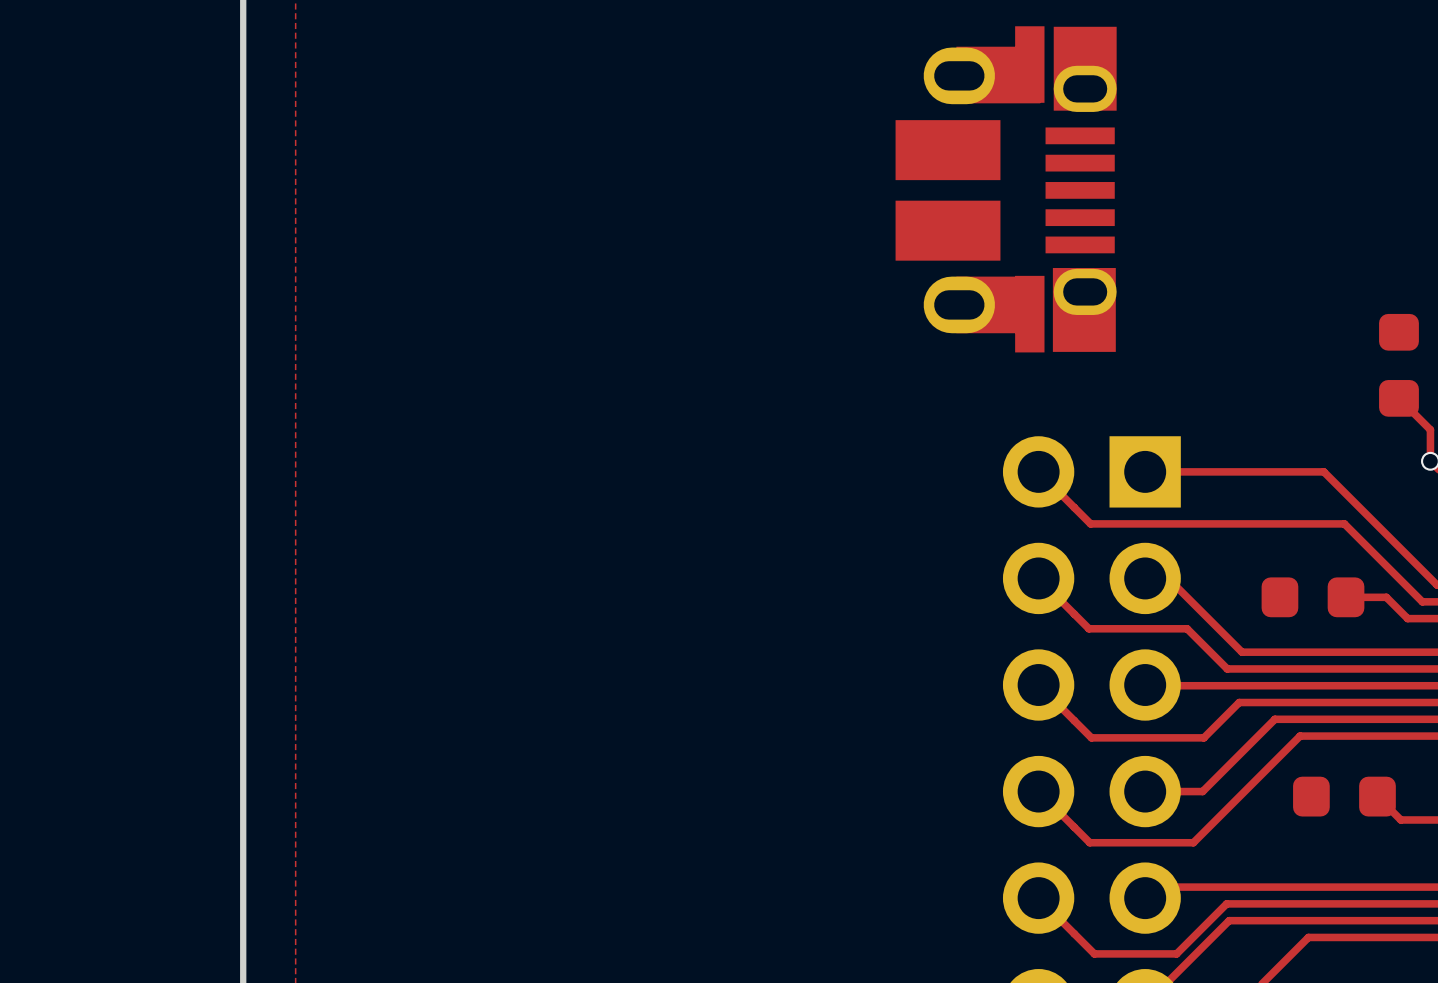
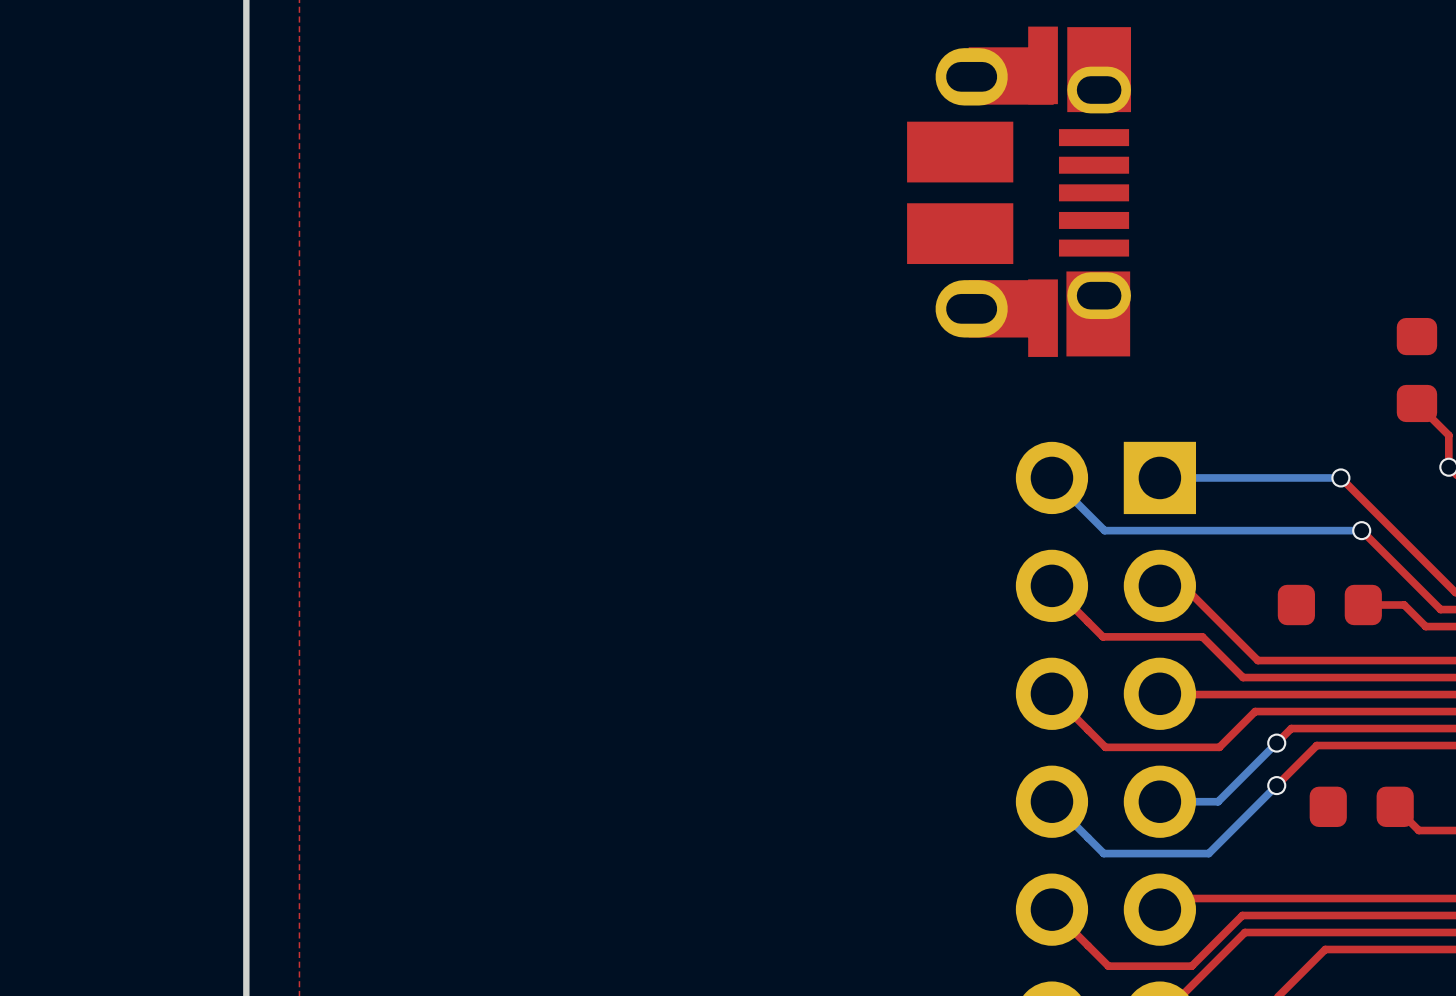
top track: (1038, 471) (1090, 523) (1344, 523) -> none
bottom track: none -> (1051, 477) (1104, 530) (1361, 530)
top track: (1323, 471) (1145, 471) -> none
bottom track: none -> (1340, 477) (1159, 477)
via: none -> (1340, 477)
via: none -> (1361, 530)
top track: (1260, 733) (1202, 791) (1145, 791) -> none
bottom track: none -> (1276, 743) (1218, 801) (1159, 801)
via: none -> (1276, 743)
top track: (1260, 775) (1193, 842) (1089, 842) (1038, 791) -> none
bottom track: none -> (1276, 785) (1208, 853) (1103, 853) (1051, 801)
via: none -> (1276, 785)

